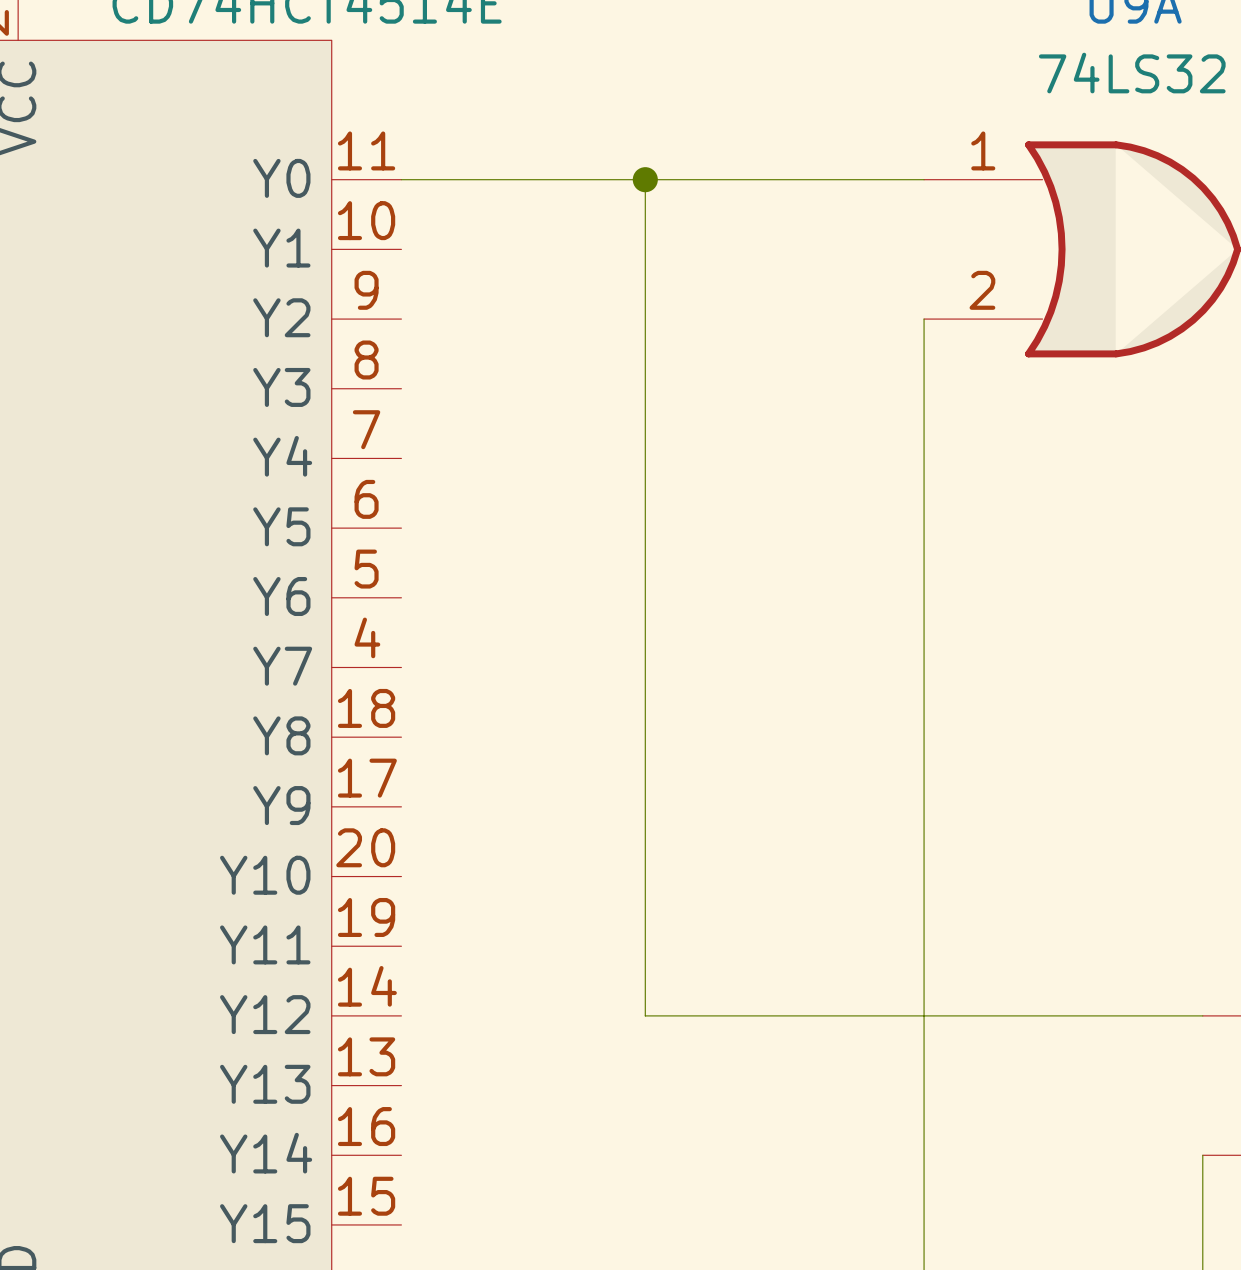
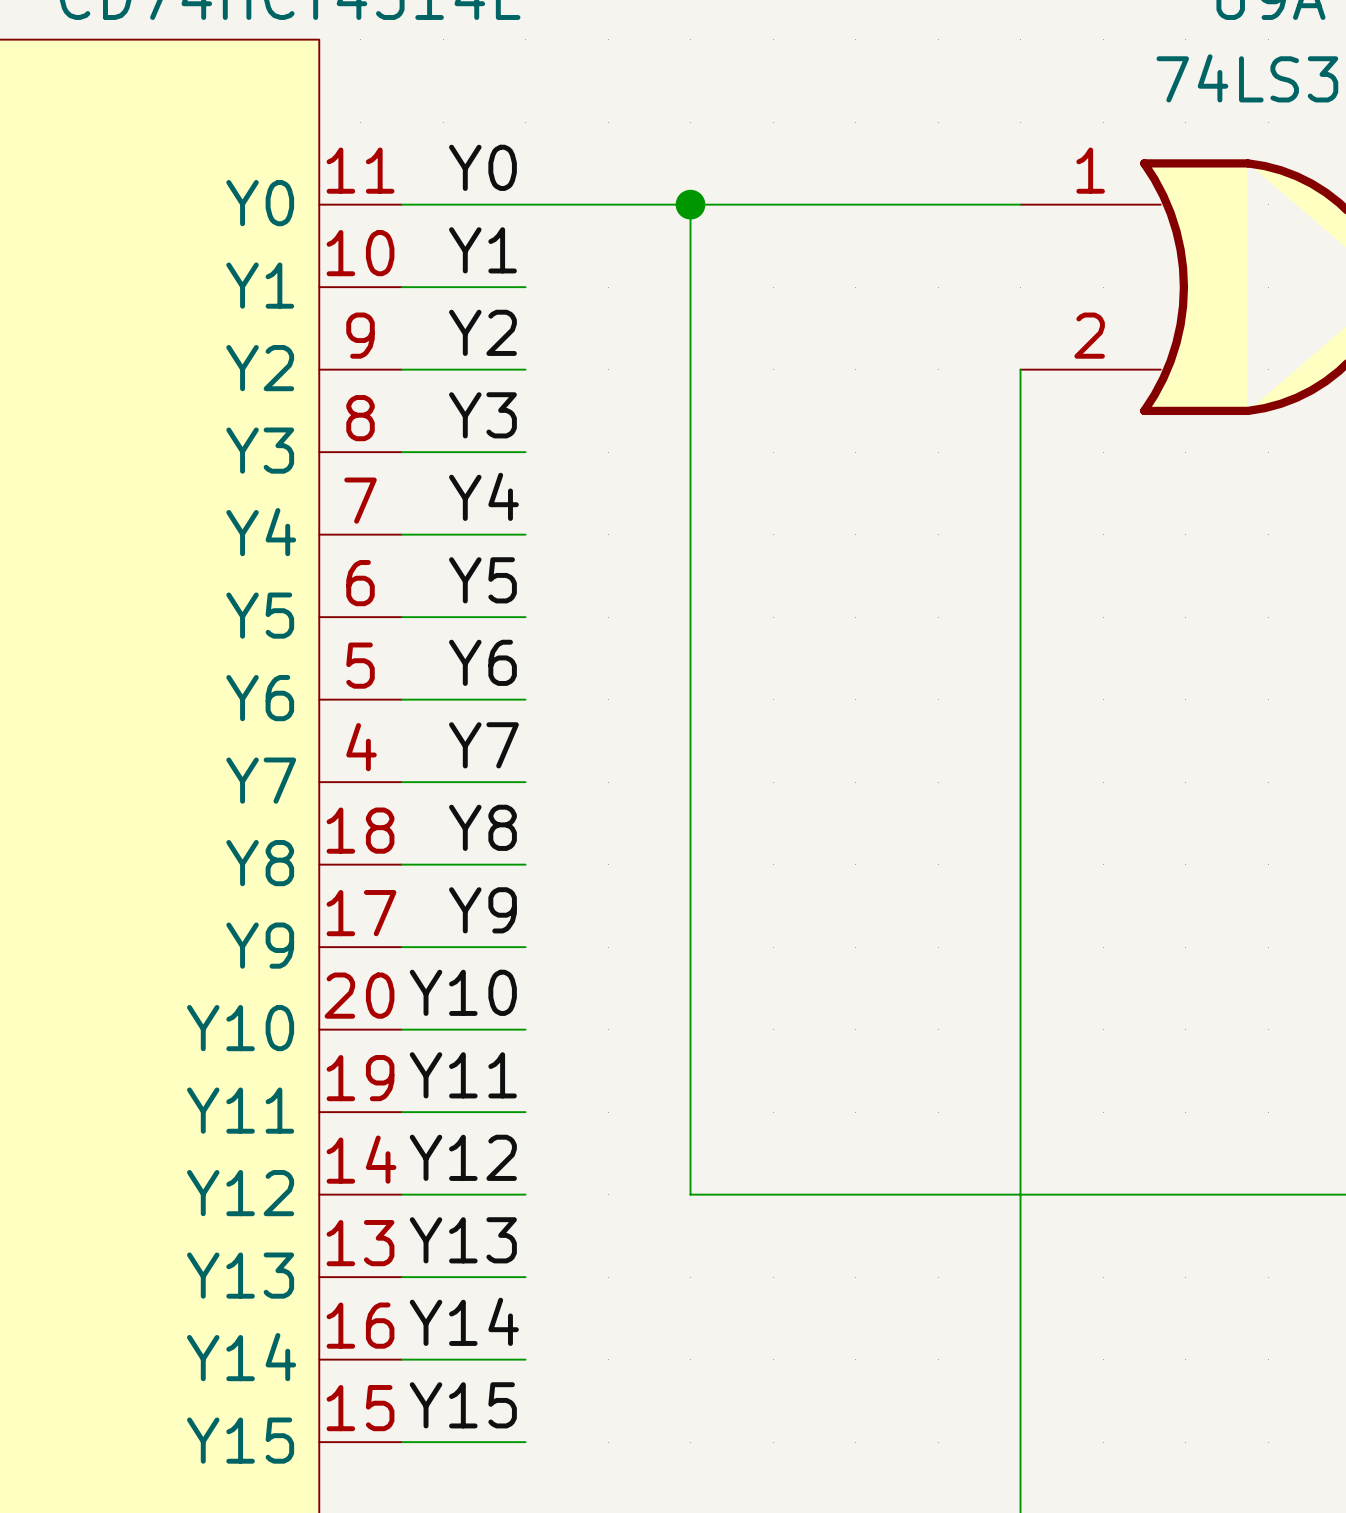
label: none -> Y0 (482, 167)
label: none -> Y1 (482, 250)
wire: none -> (401, 287) (525, 287)
label: none -> Y2 (482, 332)
wire: none -> (401, 369) (525, 369)
label: none -> Y3 (482, 415)
wire: none -> (401, 452) (525, 452)
label: none -> Y4 (483, 496)
wire: none -> (401, 534) (525, 534)
label: none -> Y5 (482, 580)
wire: none -> (401, 617) (525, 617)
label: none -> Y6 (482, 662)
wire: none -> (401, 699) (525, 699)
label: none -> Y7 (483, 745)
wire: none -> (401, 782) (525, 782)
label: none -> Y8 (482, 827)
wire: none -> (401, 864) (525, 864)
label: none -> Y9 (482, 910)
wire: none -> (401, 947) (525, 947)
label: none -> Y10 (463, 992)
wire: none -> (401, 1029) (525, 1029)
label: none -> Y11 (463, 1075)
wire: none -> (401, 1112) (525, 1112)
label: none -> Y12 (463, 1157)
wire: none -> (401, 1194) (525, 1194)
label: none -> Y13 (463, 1240)
wire: none -> (401, 1277) (525, 1277)
label: none -> Y14 (464, 1321)
wire: none -> (401, 1359) (525, 1359)
label: none -> Y15 (463, 1405)
wire: none -> (401, 1442) (525, 1442)

